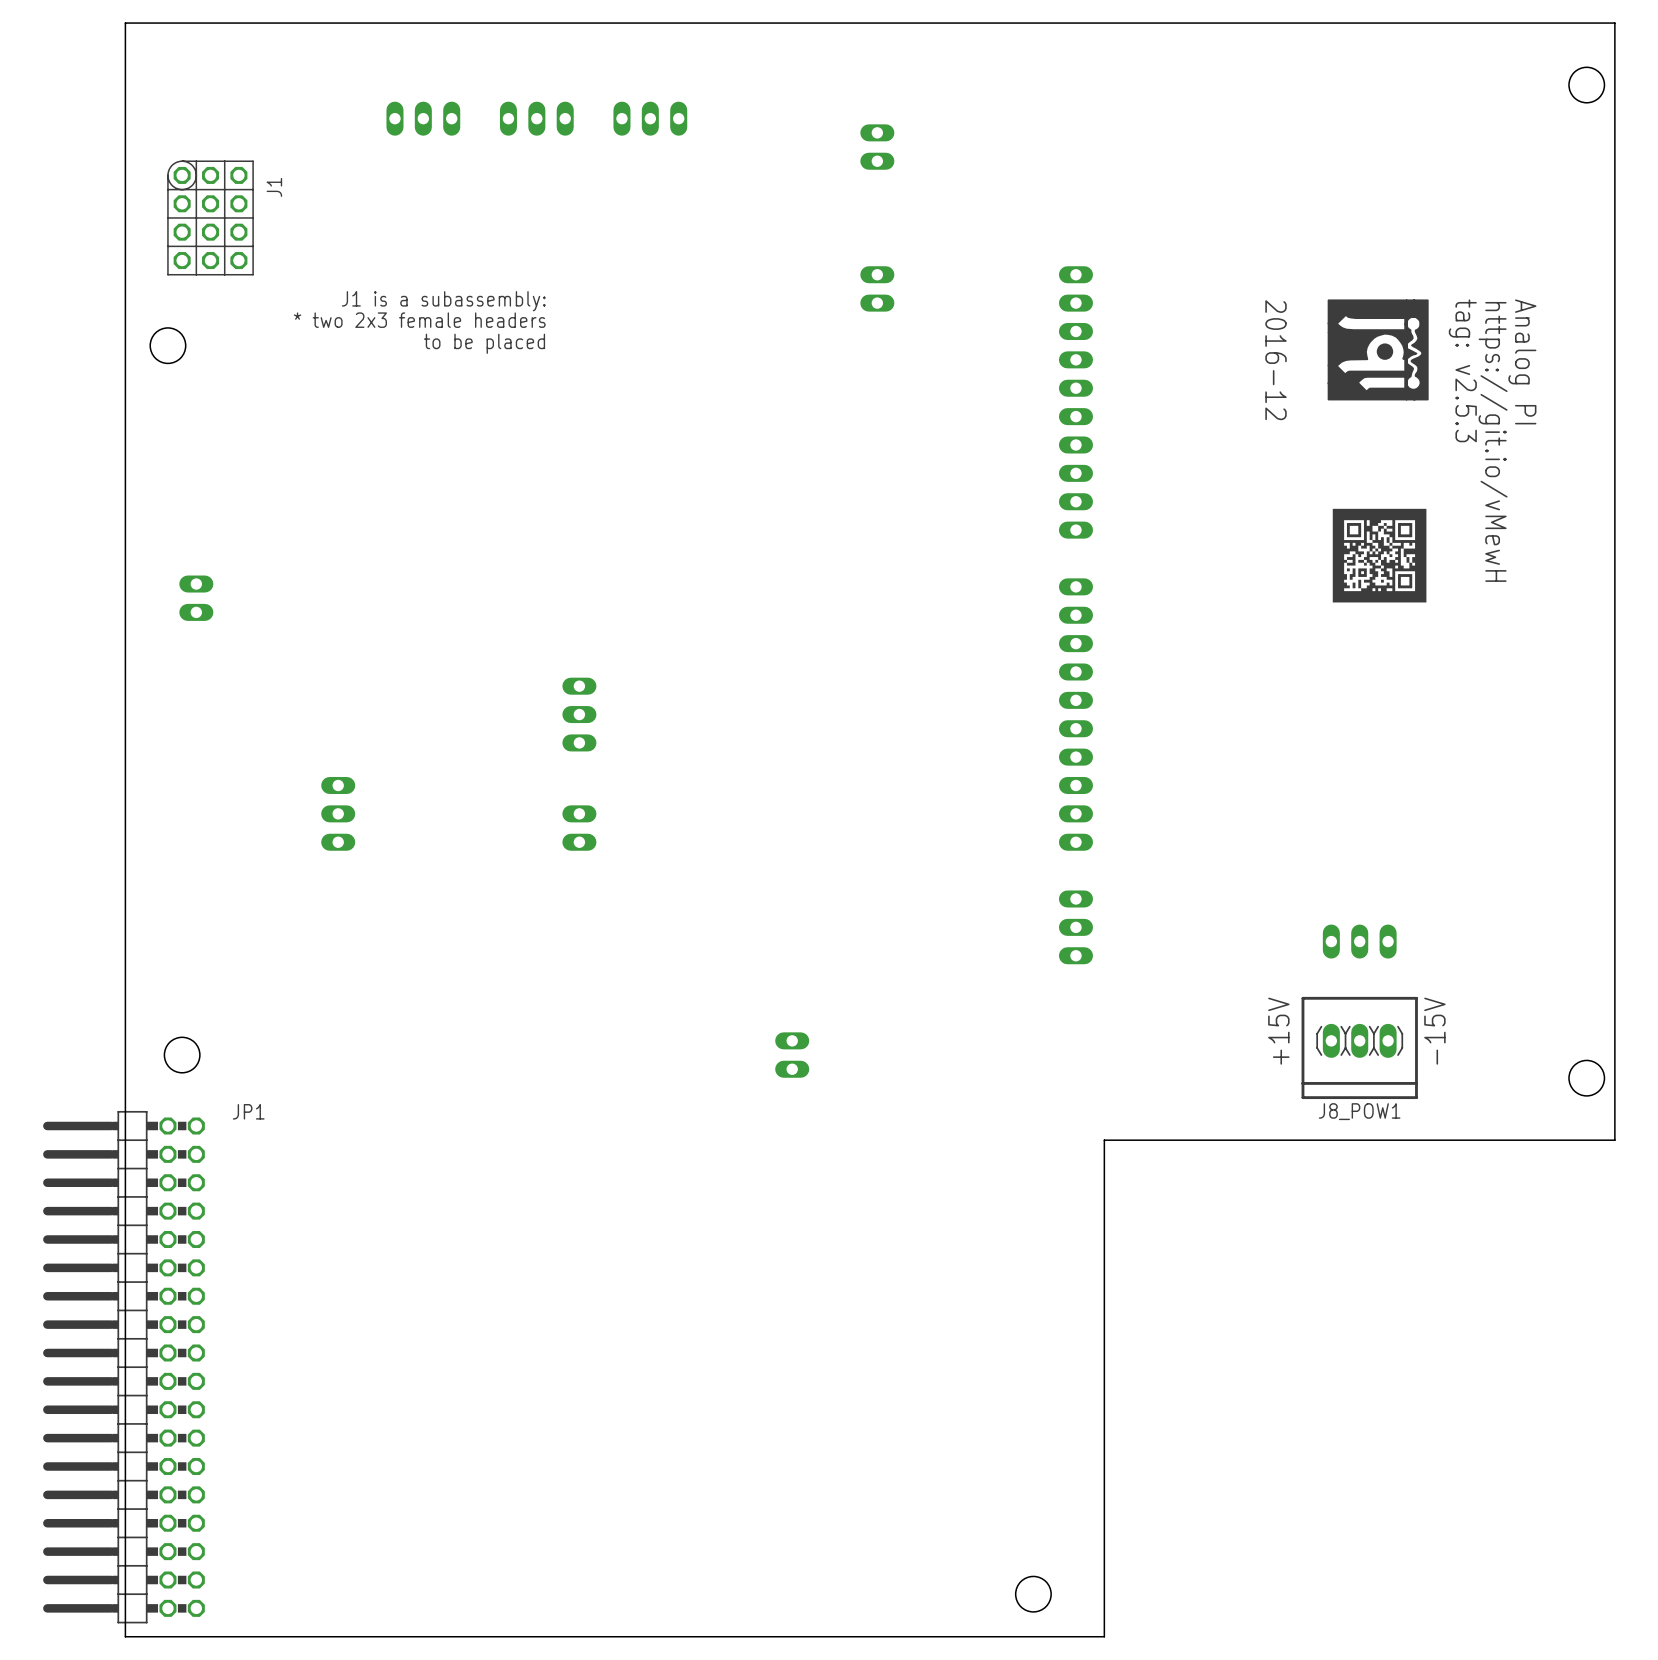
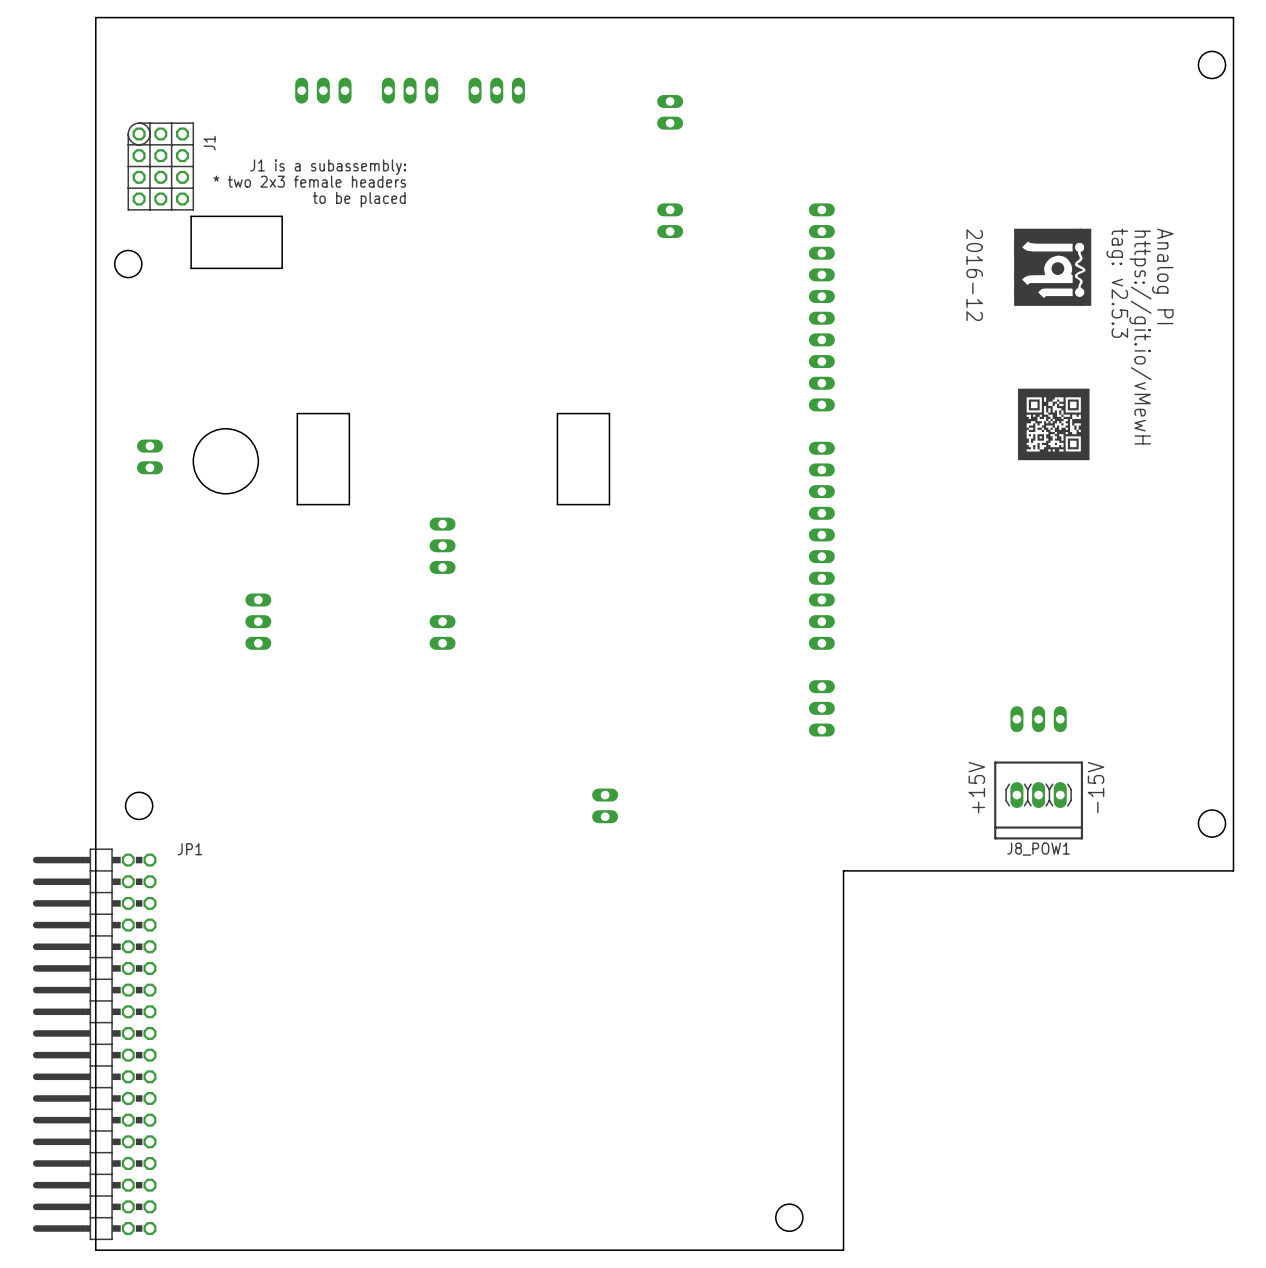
board edge: none -> (191, 216) (191, 268) (282, 268) (282, 216) (191, 216)
text position: J1 is a subassembly: (443, 301) -> J1 is a subassembly: (328, 167)
text position: * two 2x3 female headers (419, 320) -> * two 2x3 female headers (309, 181)
text position: to be placed (484, 343) -> to be placed (359, 199)
board edge: none -> (297, 413) (349, 413) (349, 504) (297, 504) (297, 413)
board edge: none -> (557, 413) (557, 504) (609, 504) (609, 413) (557, 413)
round board edge: none -> [193, 428, 259, 494]

